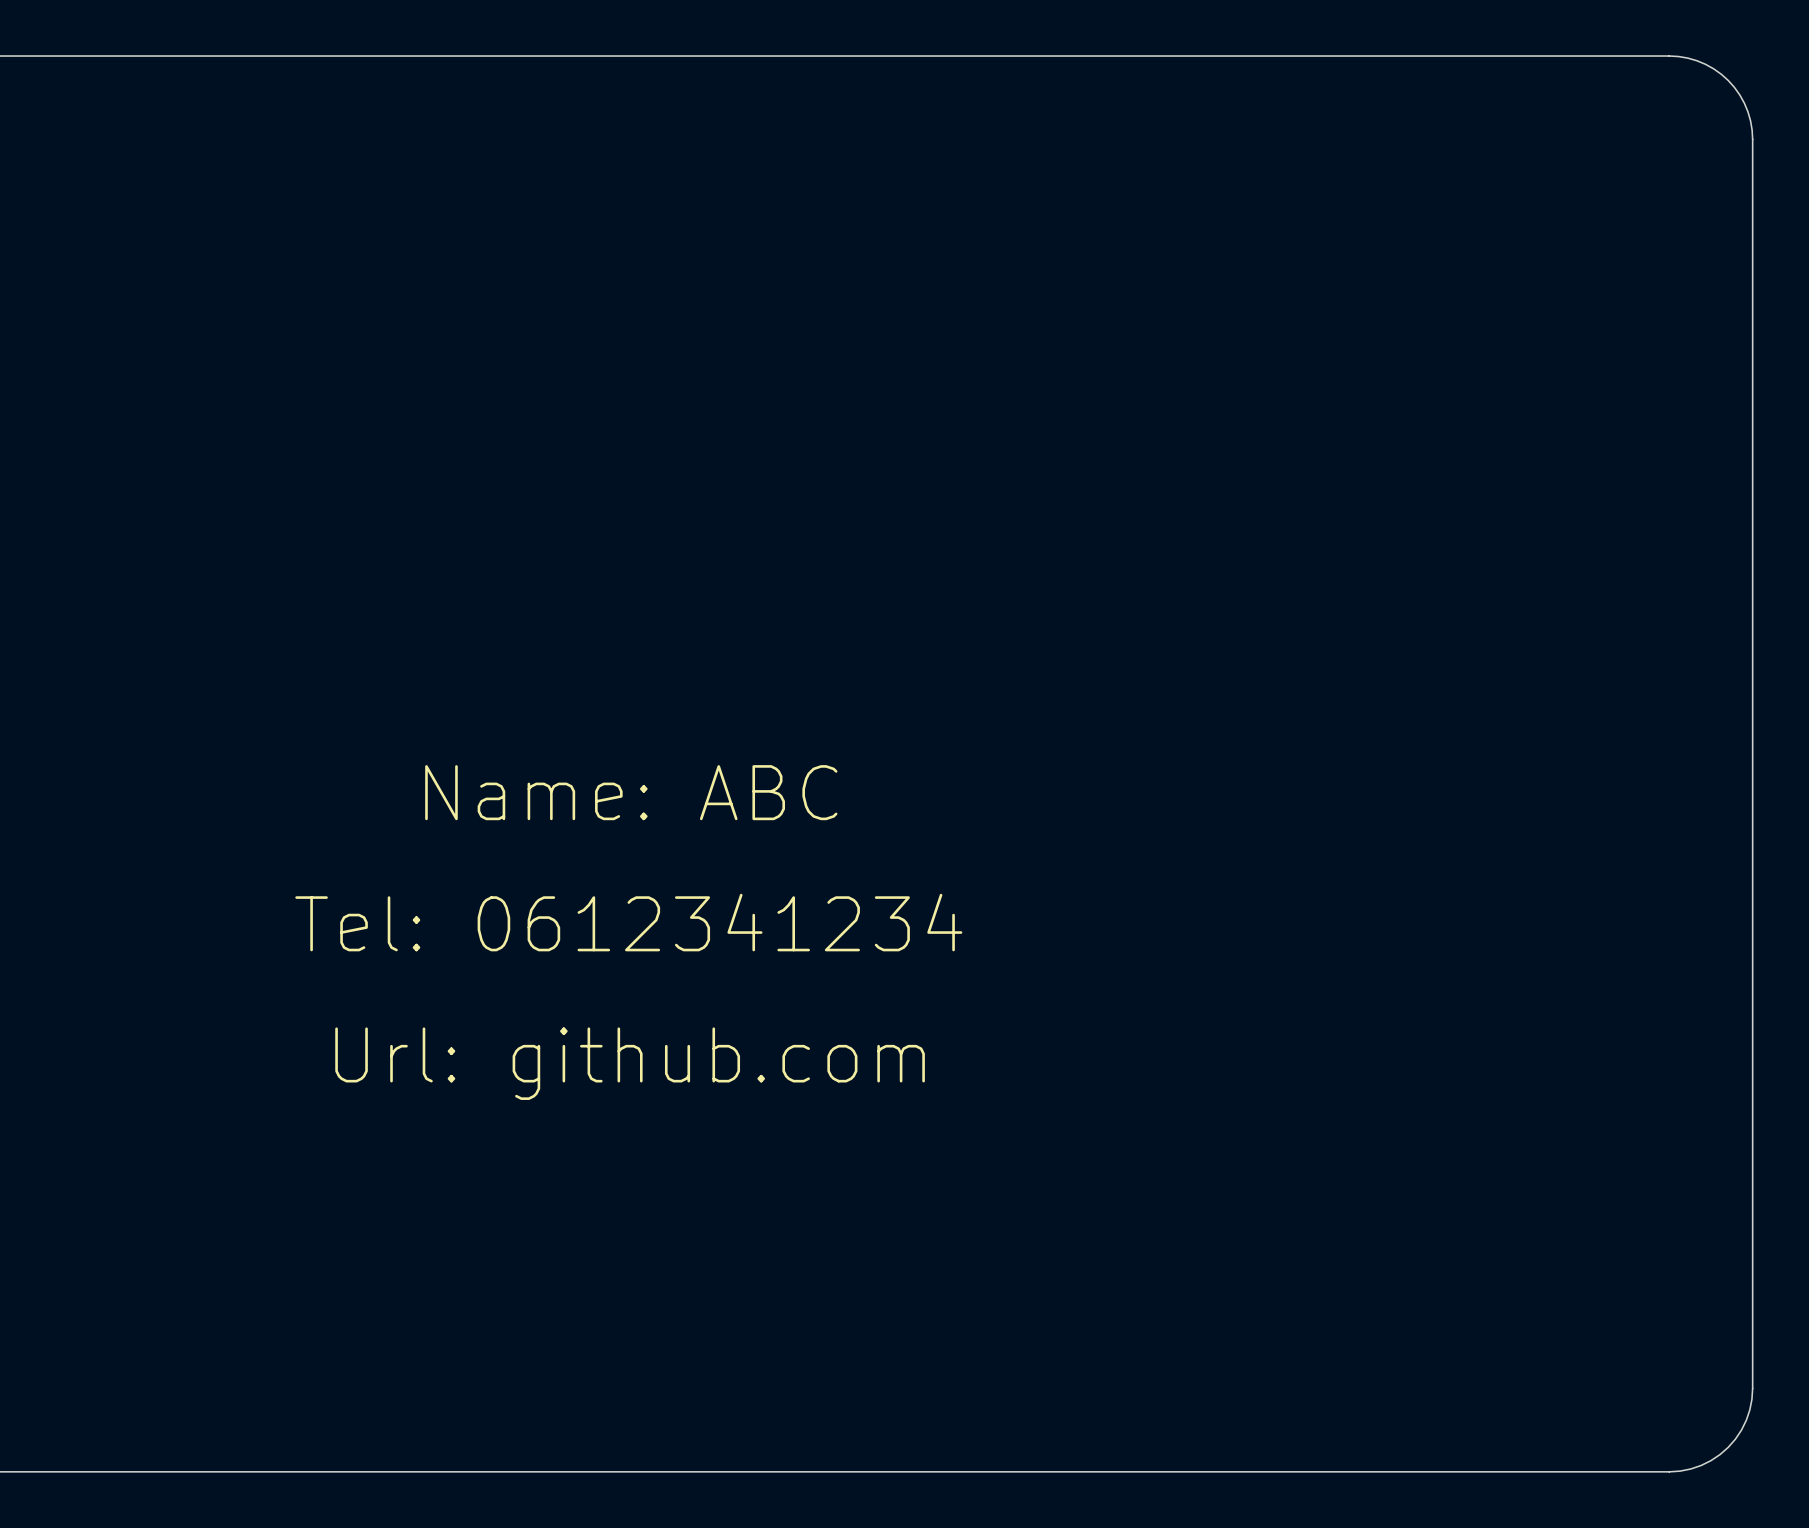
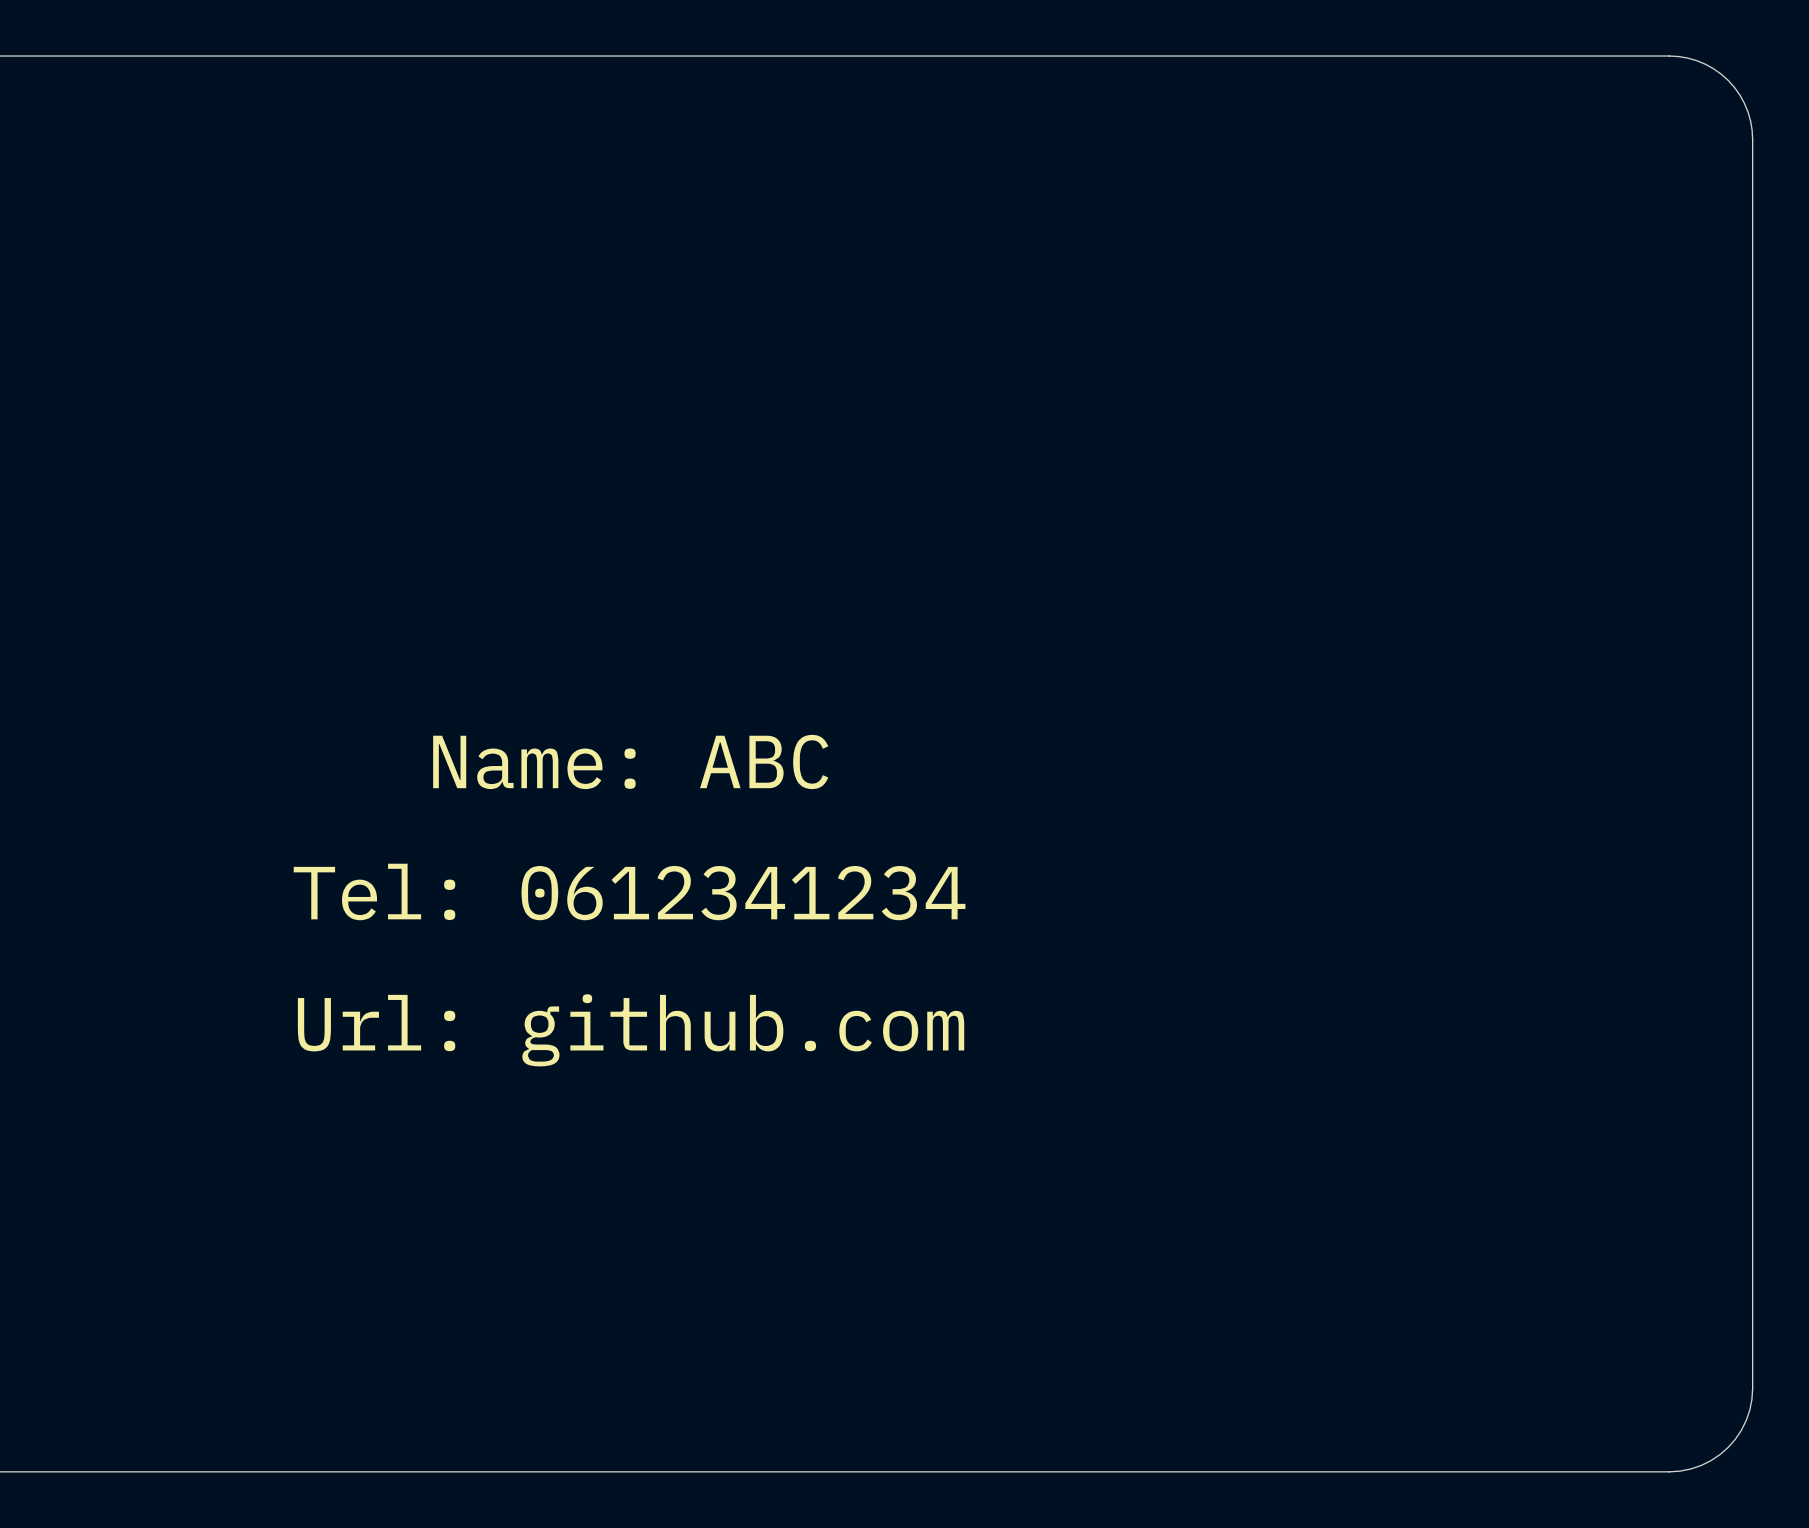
text position: Name: ABC (631, 792) -> Name: ABC (630, 761)
text position: Tel: 0612341234 (628, 922) -> Tel: 0612341234 (629, 891)
text position: Url: github.com (630, 1063) -> Url: github.com (631, 1030)

